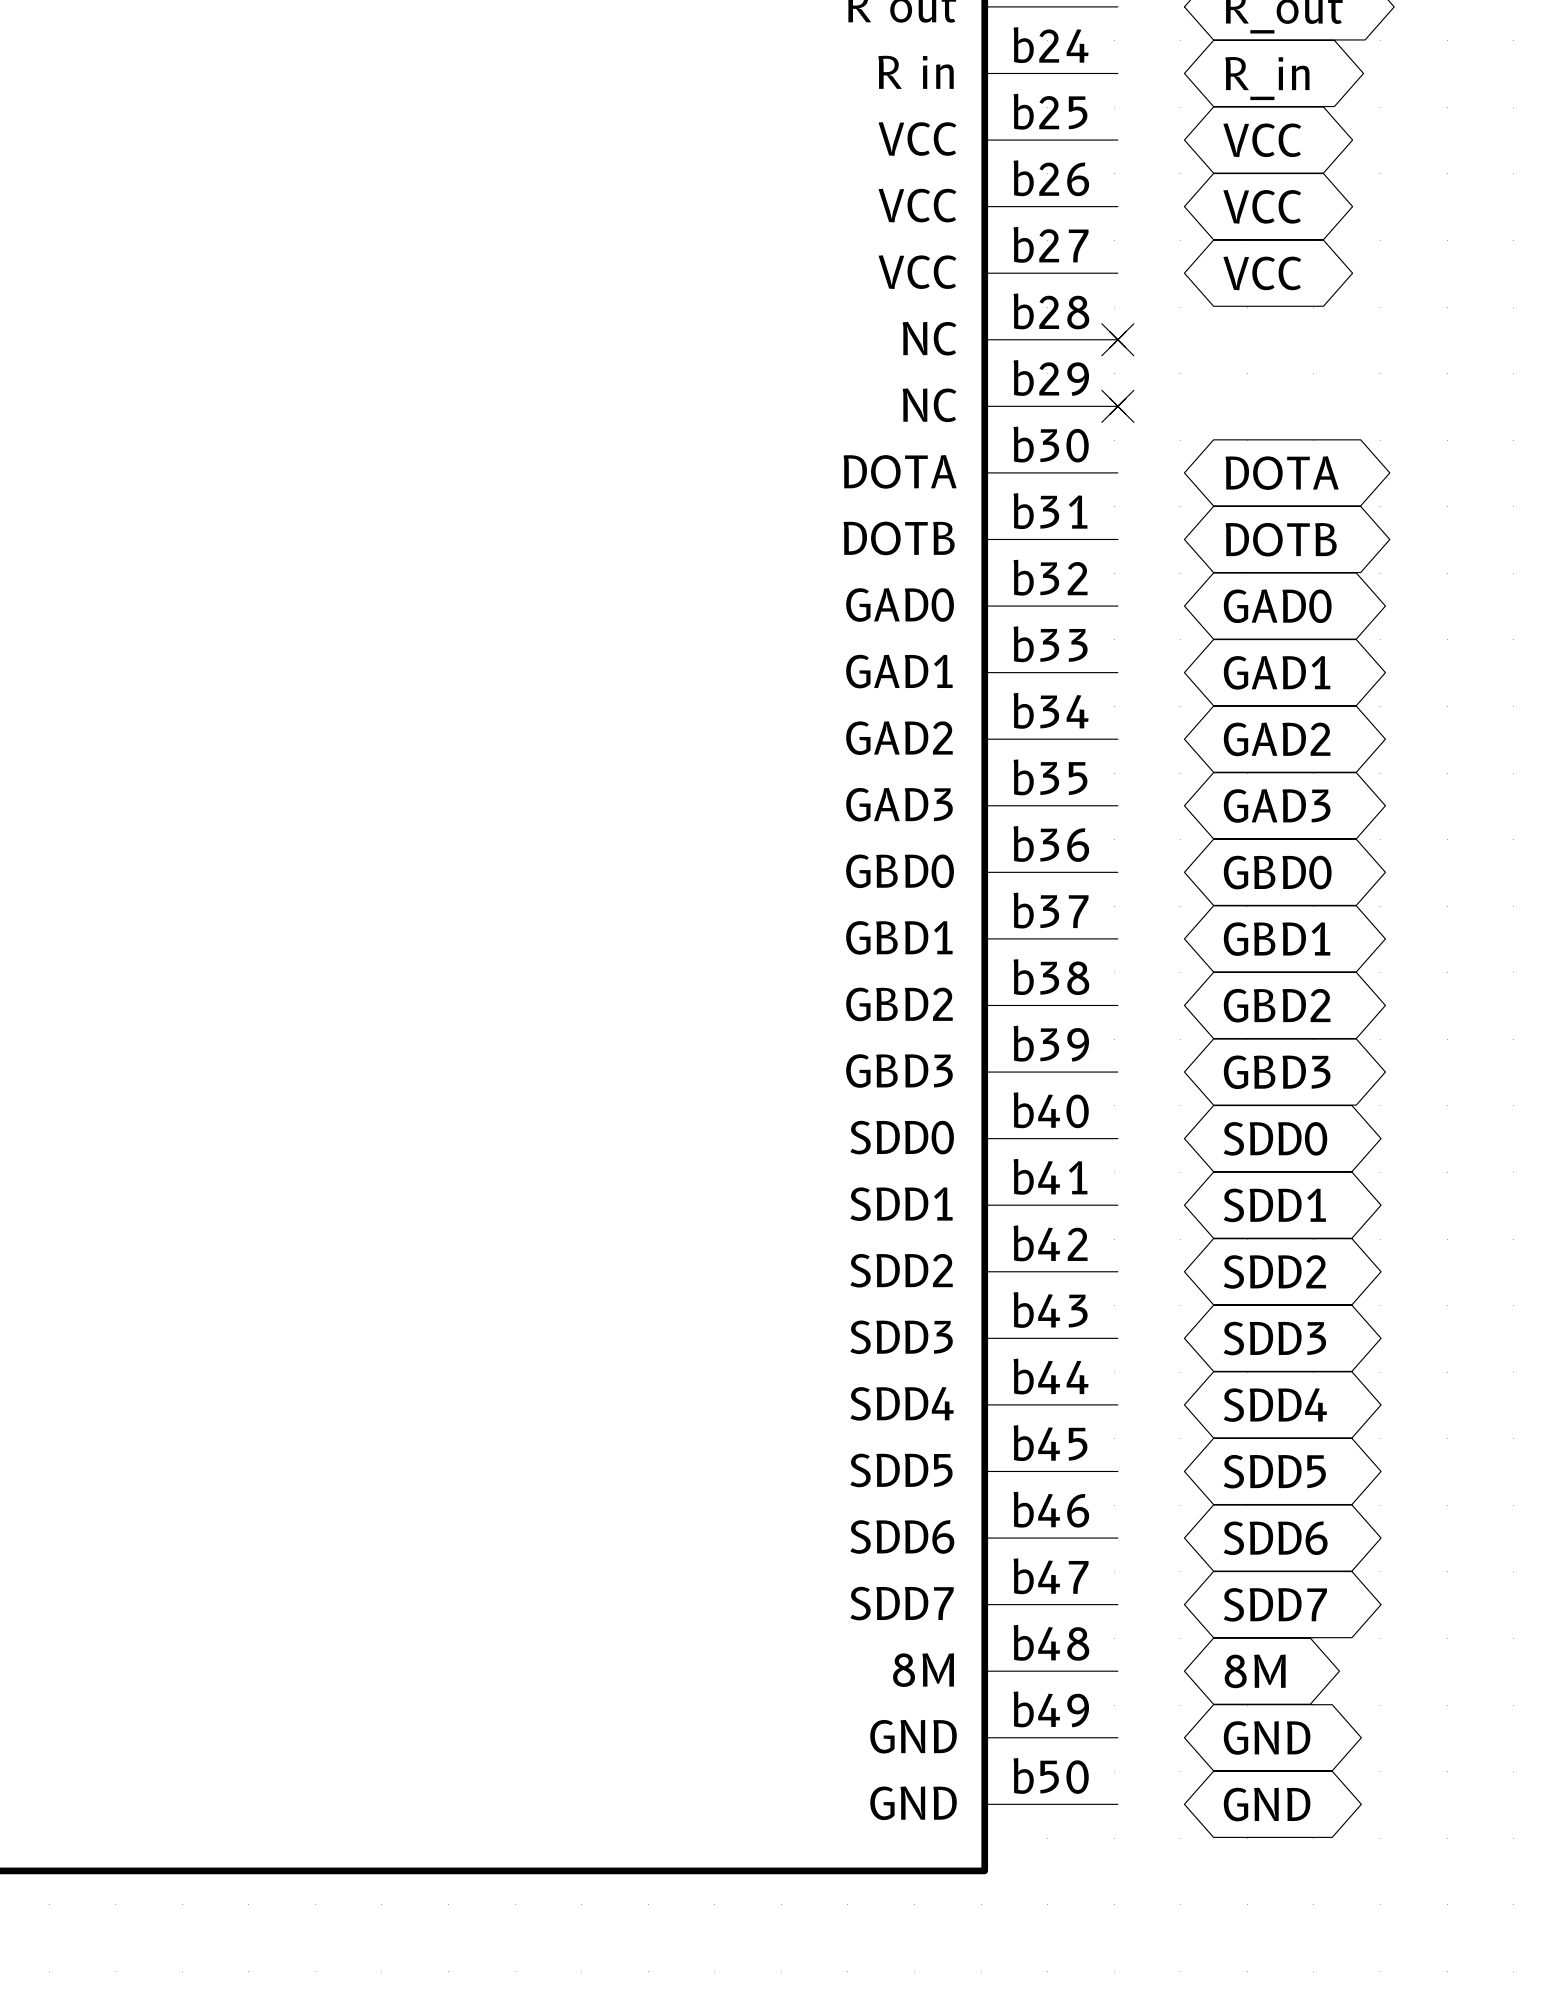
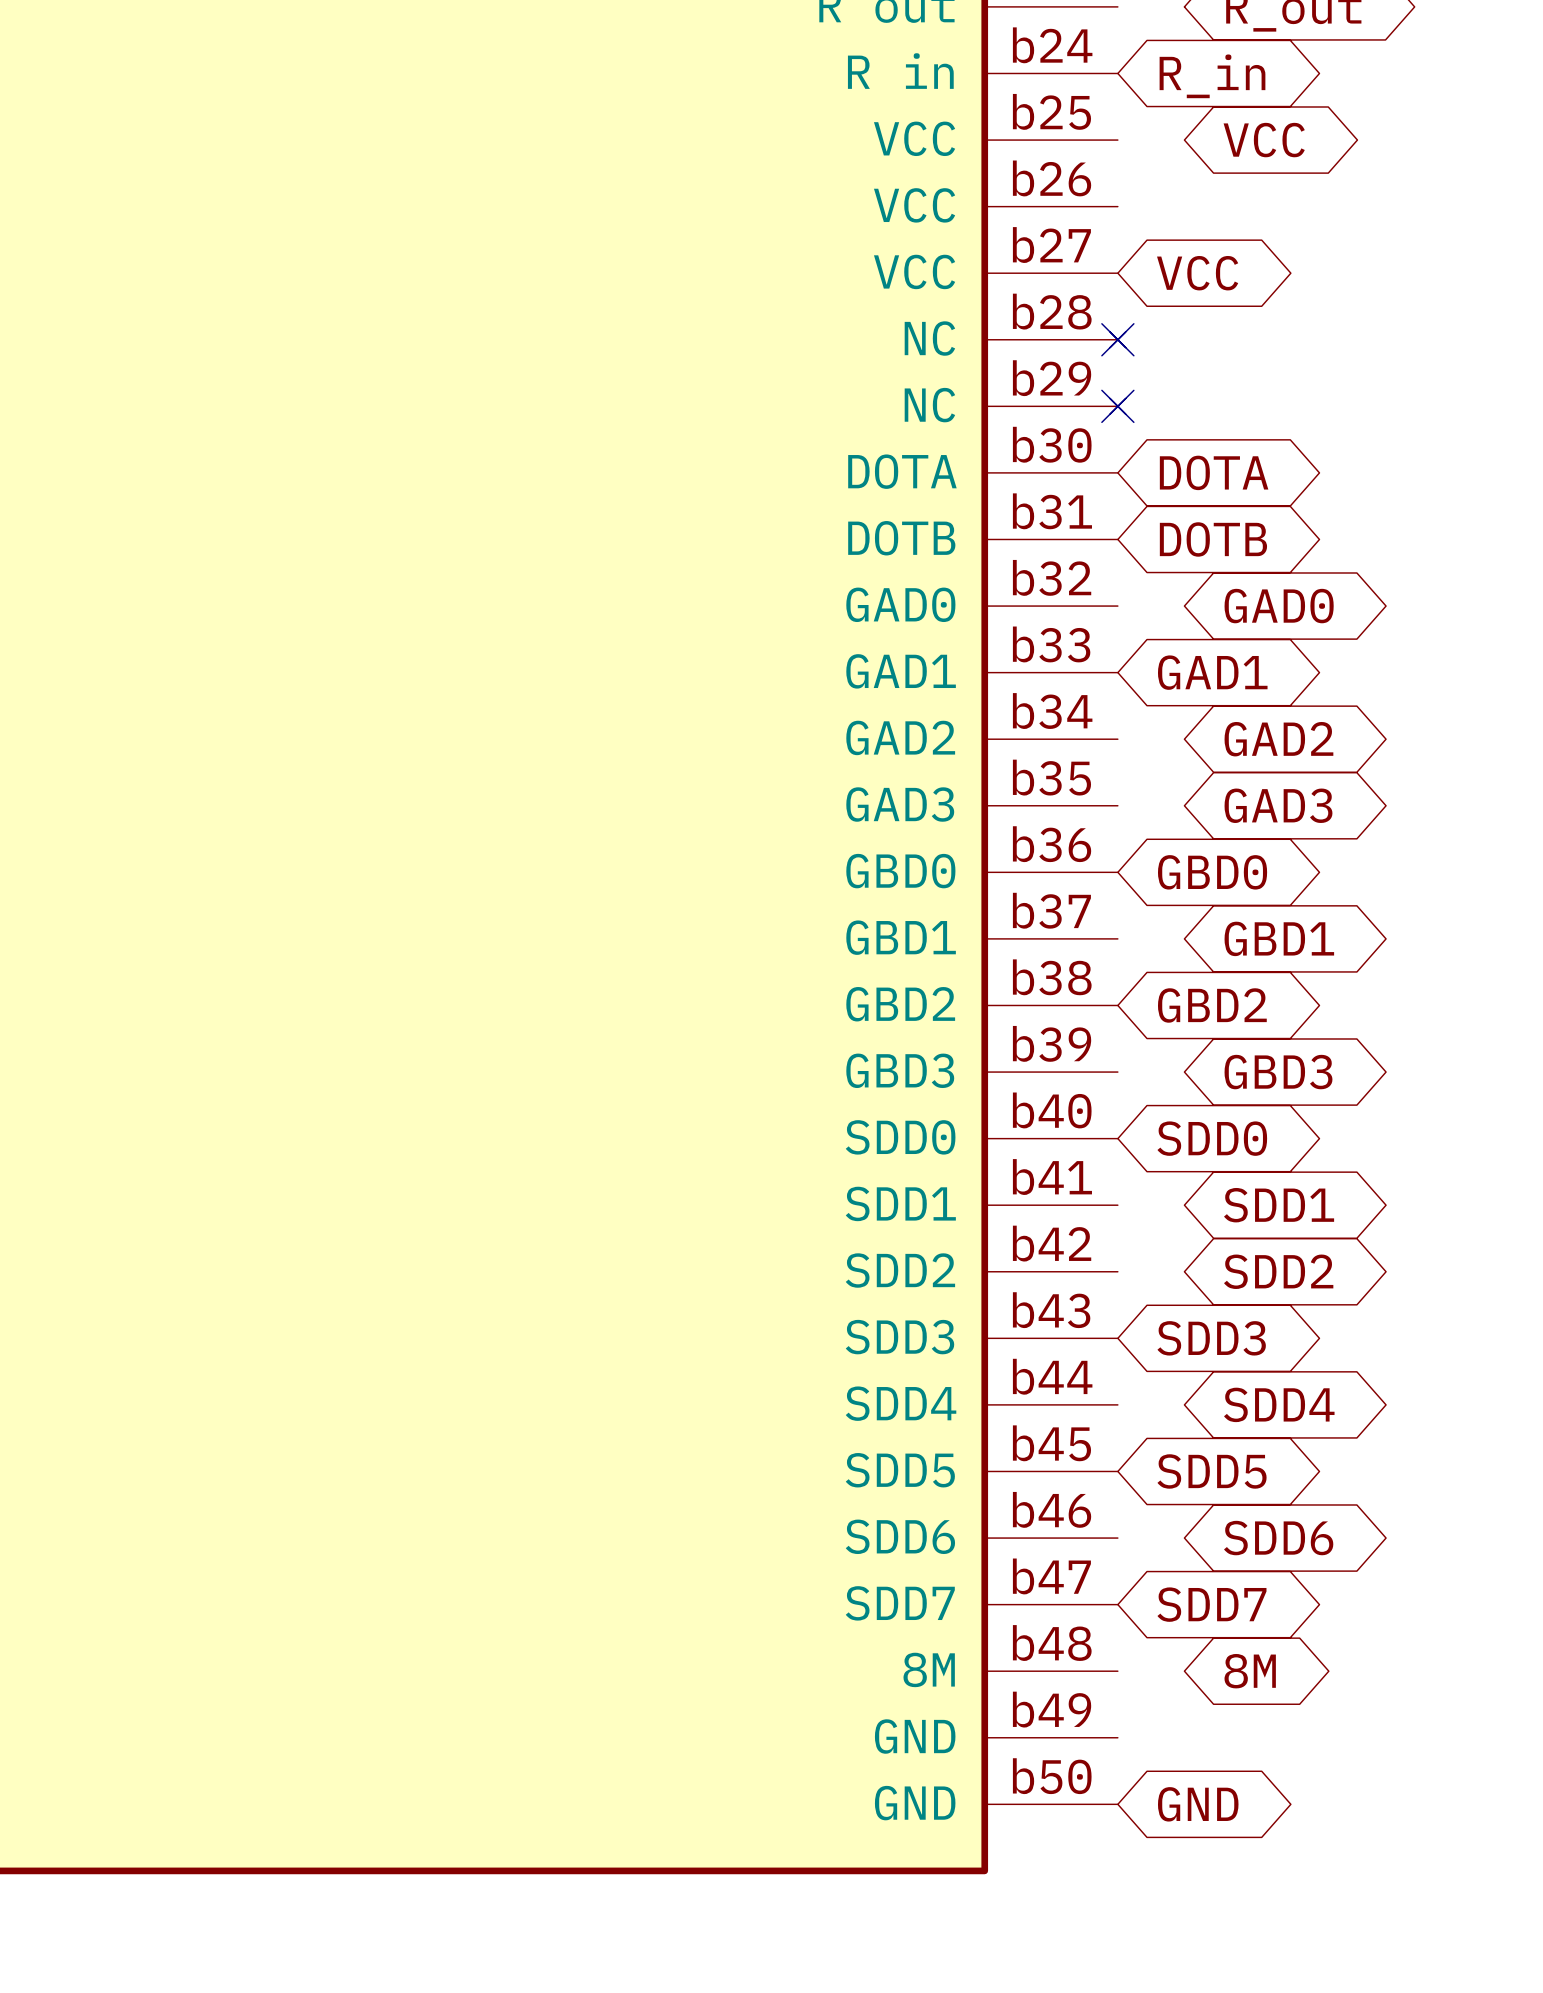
global label position: R_in (1267, 78) -> R_in (1212, 76)
global label: VCC (1262, 206) -> none
global label: none -> VCC (1197, 273)
global label: VCC (1262, 273) -> none
global label position: DOTA (1282, 473) -> DOTA (1214, 472)
global label position: DOTB (1281, 539) -> DOTB (1213, 539)
global label position: GAD1 (1277, 672) -> GAD1 (1212, 672)
global label position: GBD0 (1277, 872) -> GBD0 (1212, 872)
global label position: GBD2 (1277, 1005) -> GBD2 (1212, 1005)
global label position: SDD0 (1275, 1138) -> SDD0 (1212, 1138)
global label position: SDD3 (1274, 1338) -> SDD3 (1211, 1338)
global label position: SDD5 (1274, 1471) -> SDD5 (1212, 1471)
global label position: SDD7 (1275, 1604) -> SDD7 (1211, 1604)
global label: GND (1267, 1737) -> none
global label: none -> GND (1198, 1804)
global label: GND (1267, 1804) -> none

